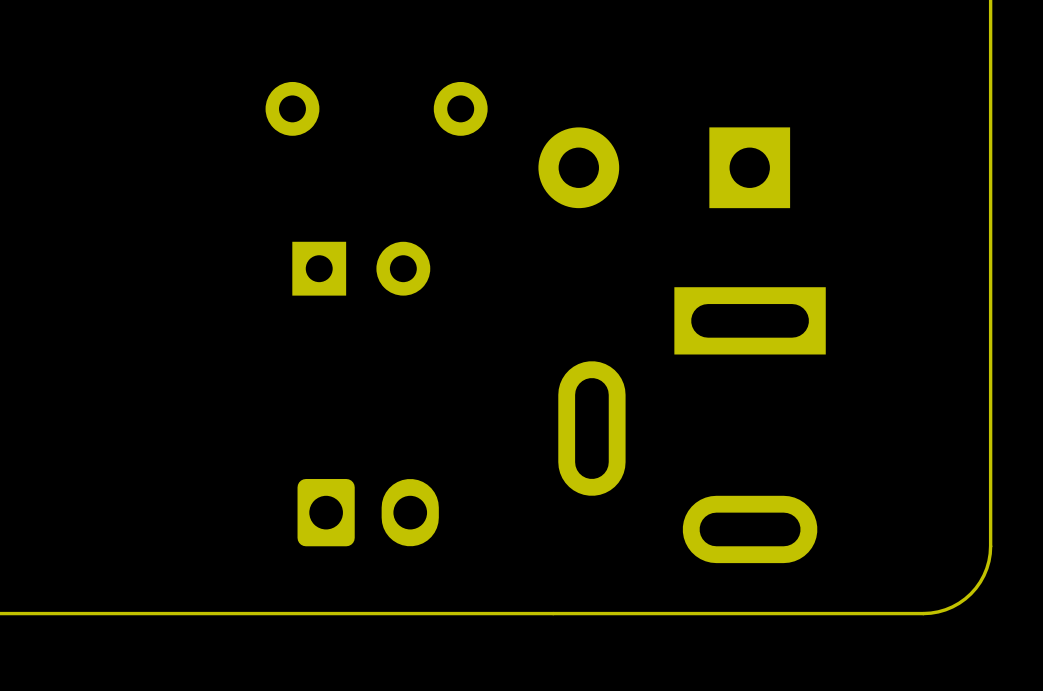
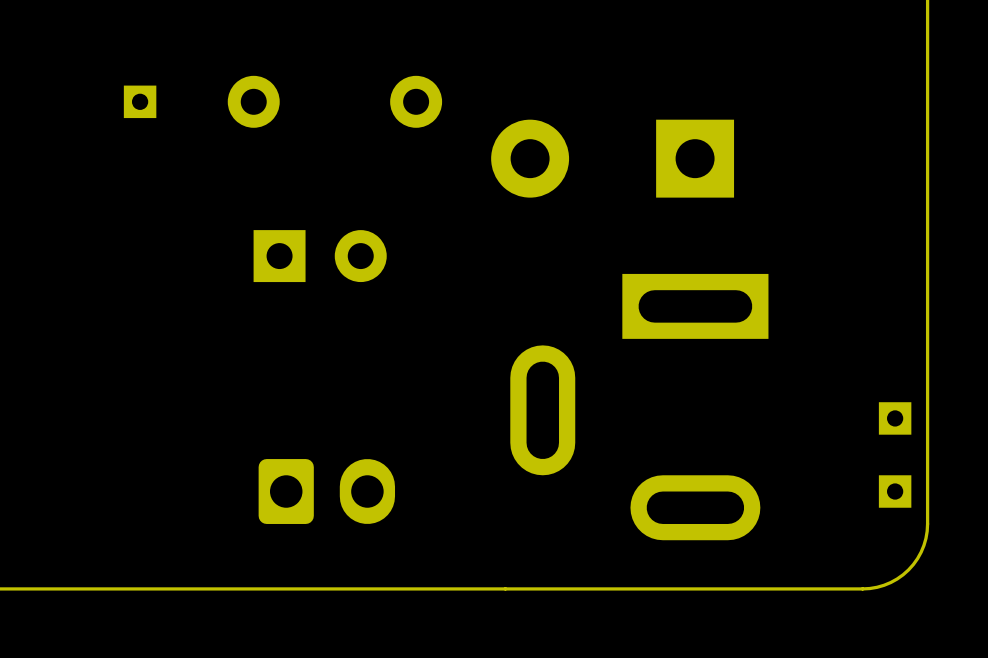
part: none -> (140, 101)
part: none -> (895, 418)
part: none -> (895, 491)

